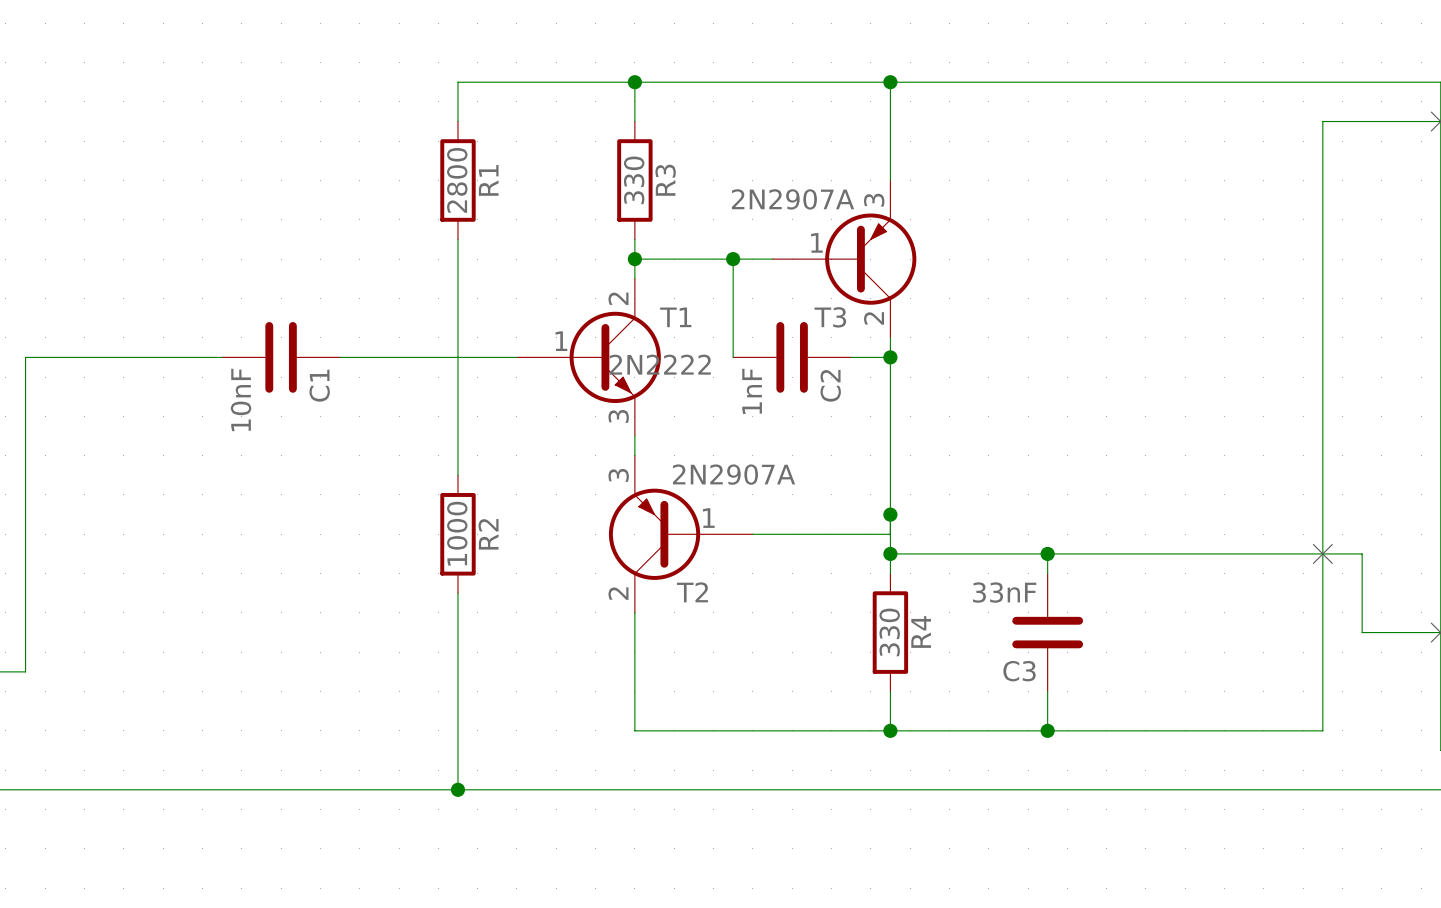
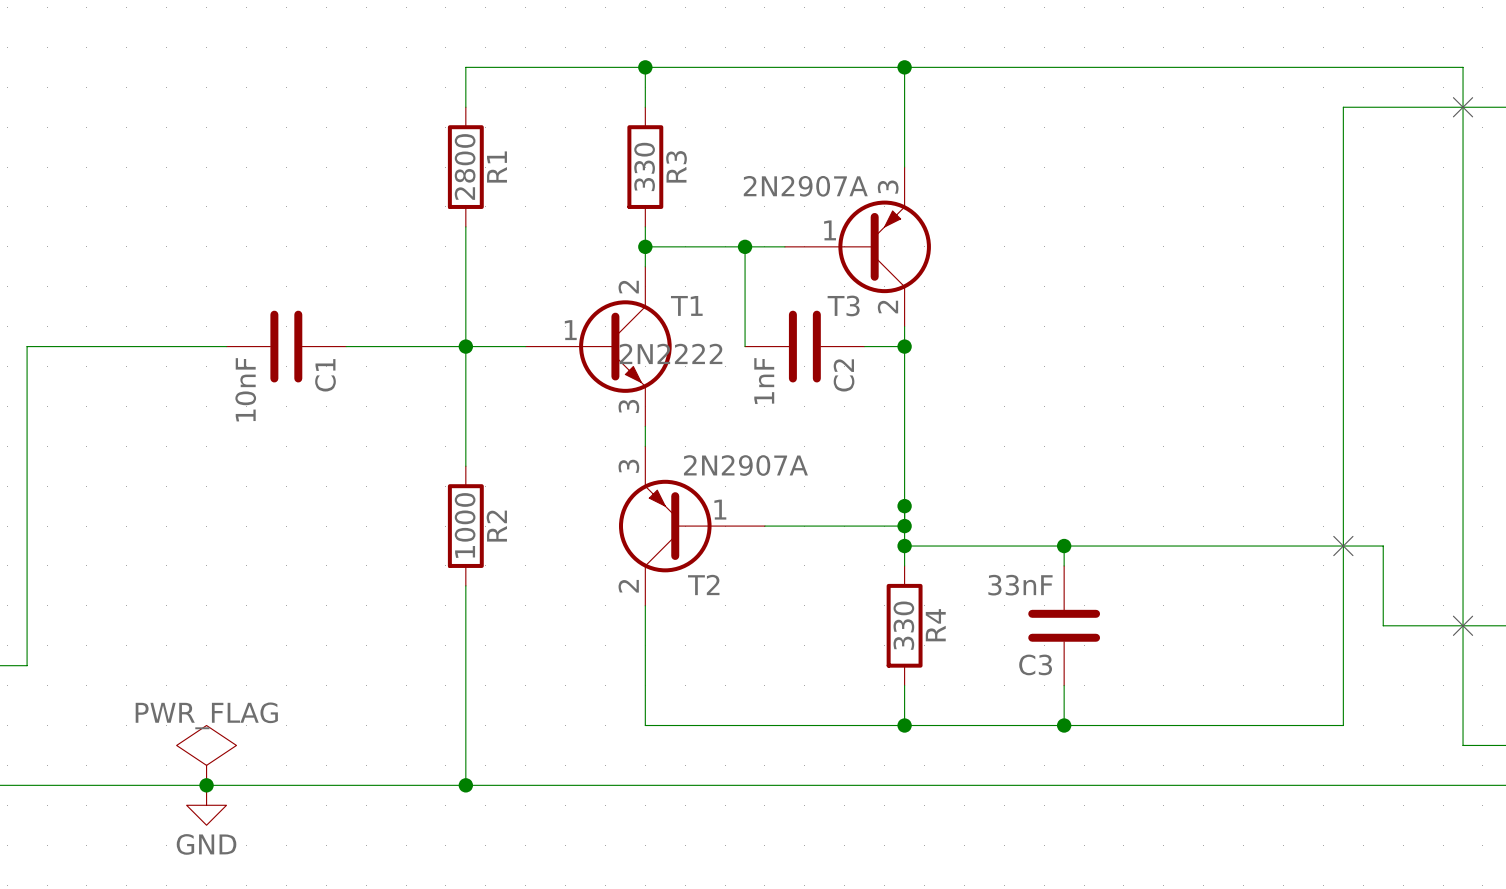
junction: none -> (465, 346)
junction: none -> (904, 526)
power symbol: none -> PWR_FLAG (206, 755)
junction: none -> (206, 785)
power symbol: none -> GND (206, 805)

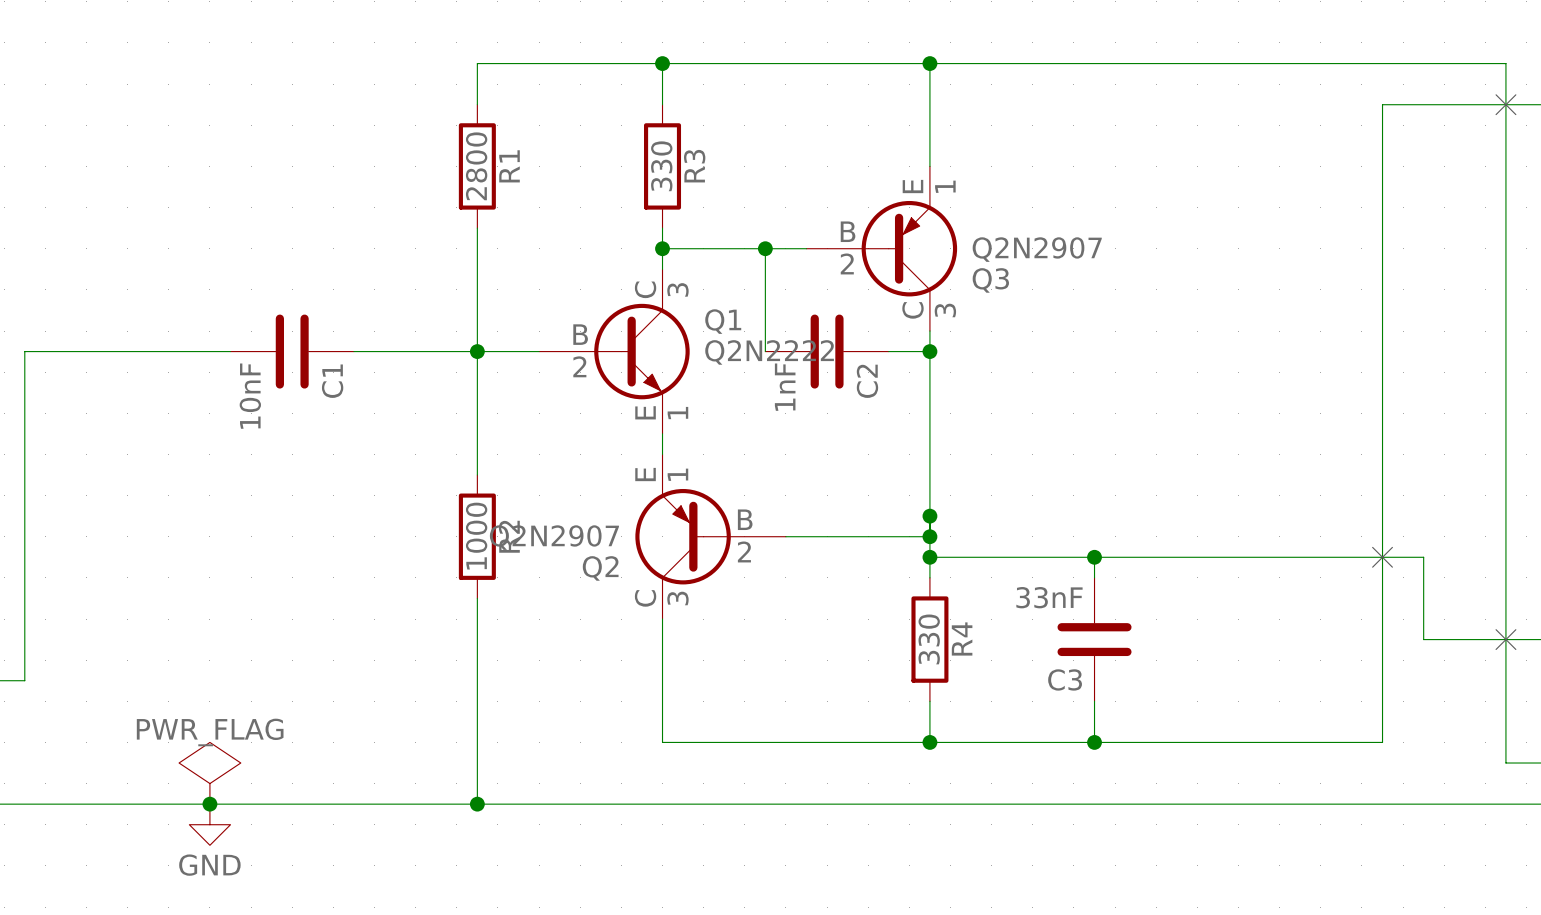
T3: 2N2907A (857, 246) -> none
Q3: none -> Q2N2907 (881, 248)
T1: 2N2222 (598, 346) -> none
Q1: none -> Q2N2222 (614, 351)
T2: 2N2907A (691, 526) -> none
Q2: none -> Q2N2907 (710, 536)

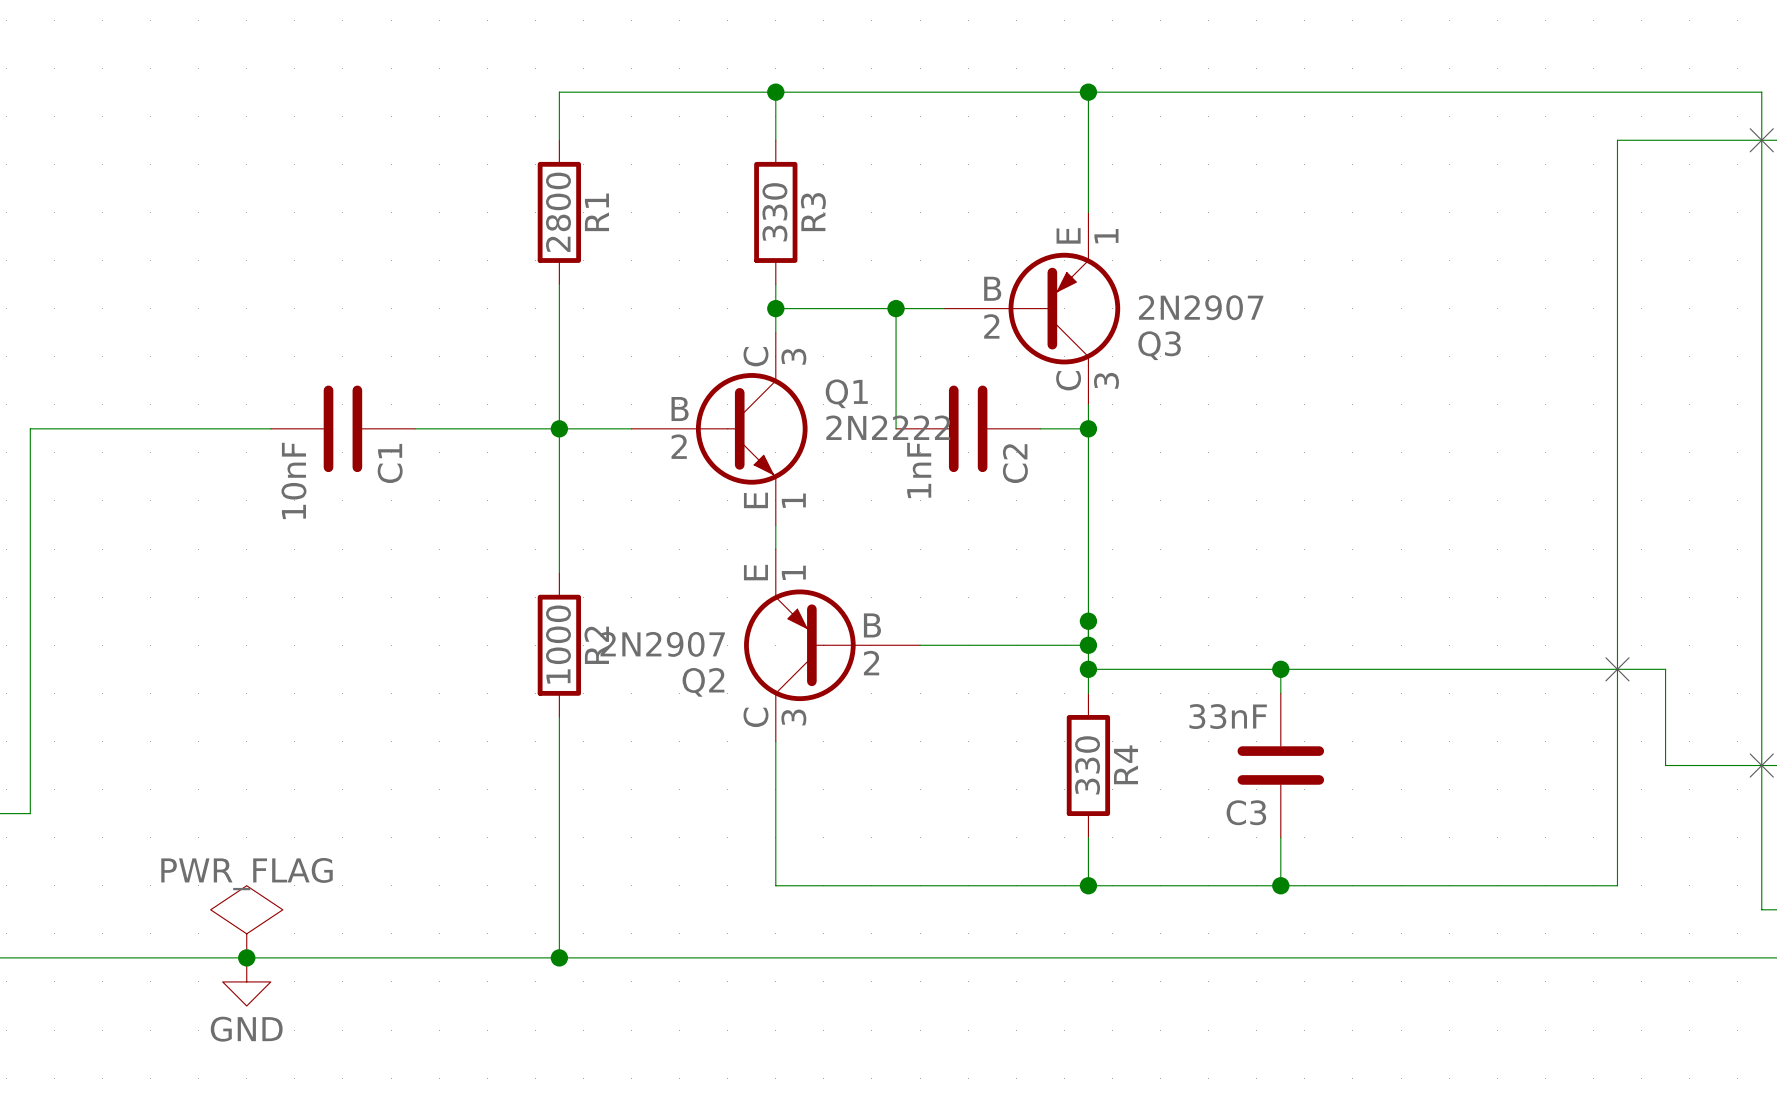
Q3 value: Q2N2907 (1037, 249) -> 2N2907 (1201, 307)
Q1 value: Q2N2222 (769, 352) -> 2N2222 (888, 427)
Q2 value: Q2N2907 (554, 537) -> 2N2907 (662, 644)

